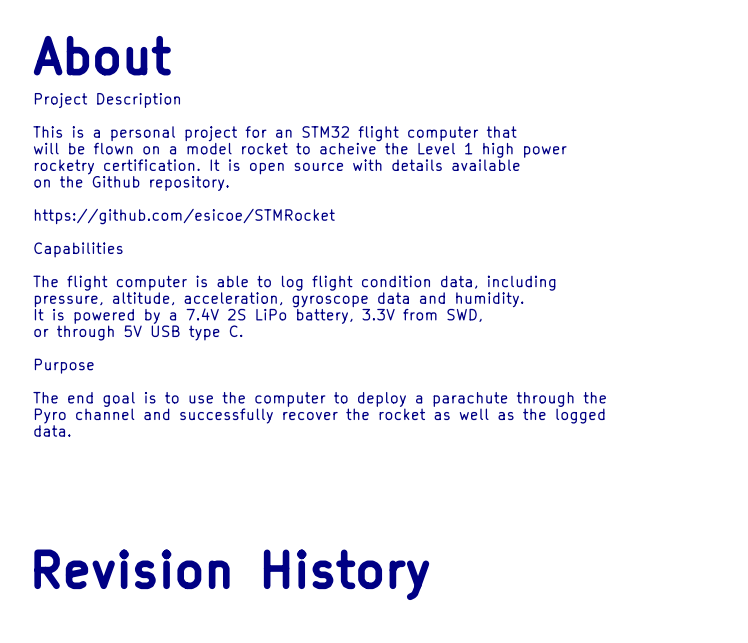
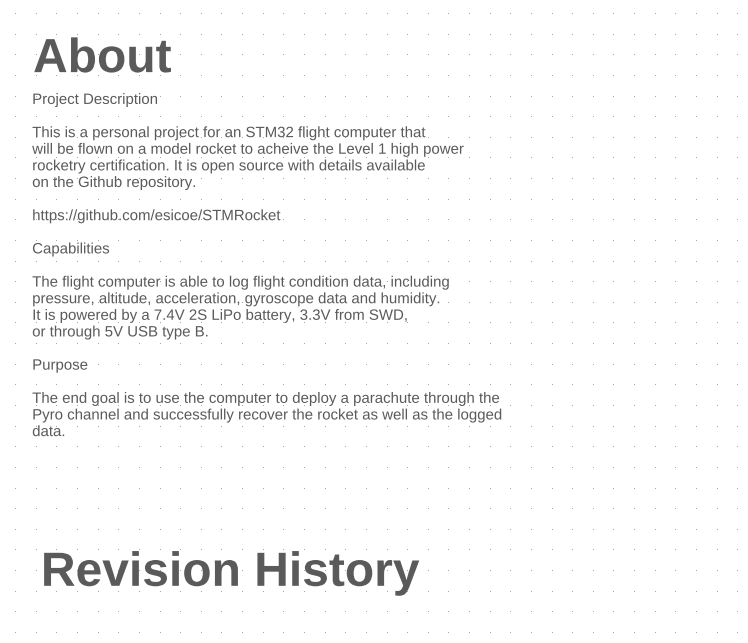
text: or through 5V USB type C. (138, 332) -> or through 5V USB type B. (120, 332)

